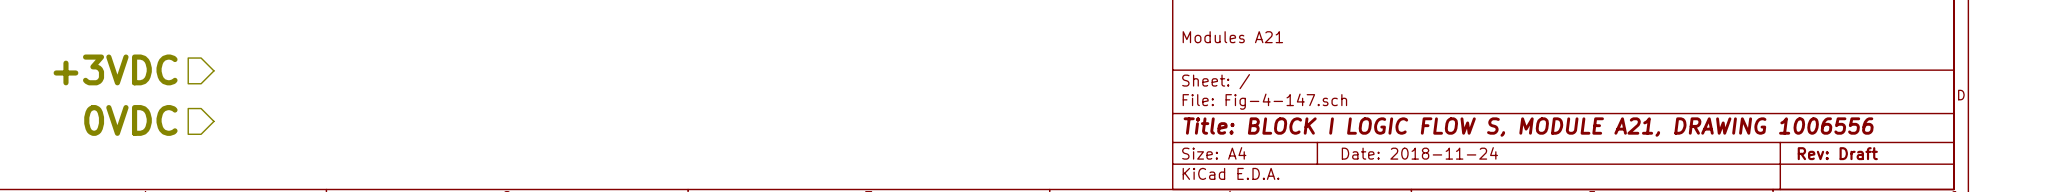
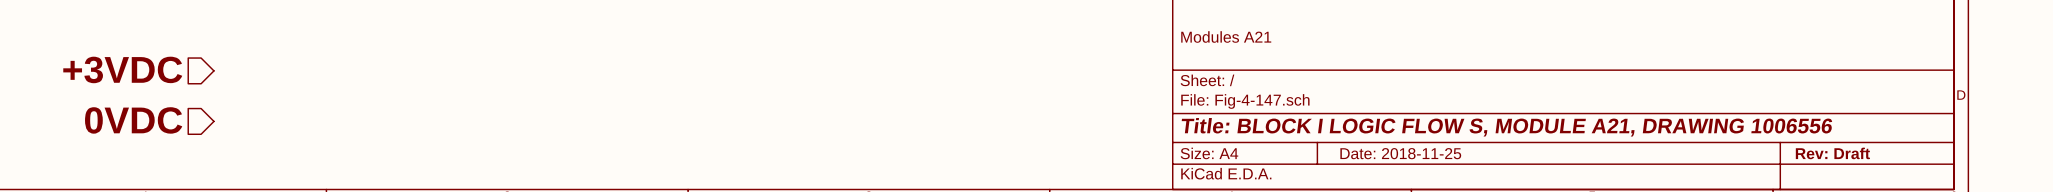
title block: Date: 2018-11-24 (1419, 153) -> Date: 2018-11-25 (1400, 153)

